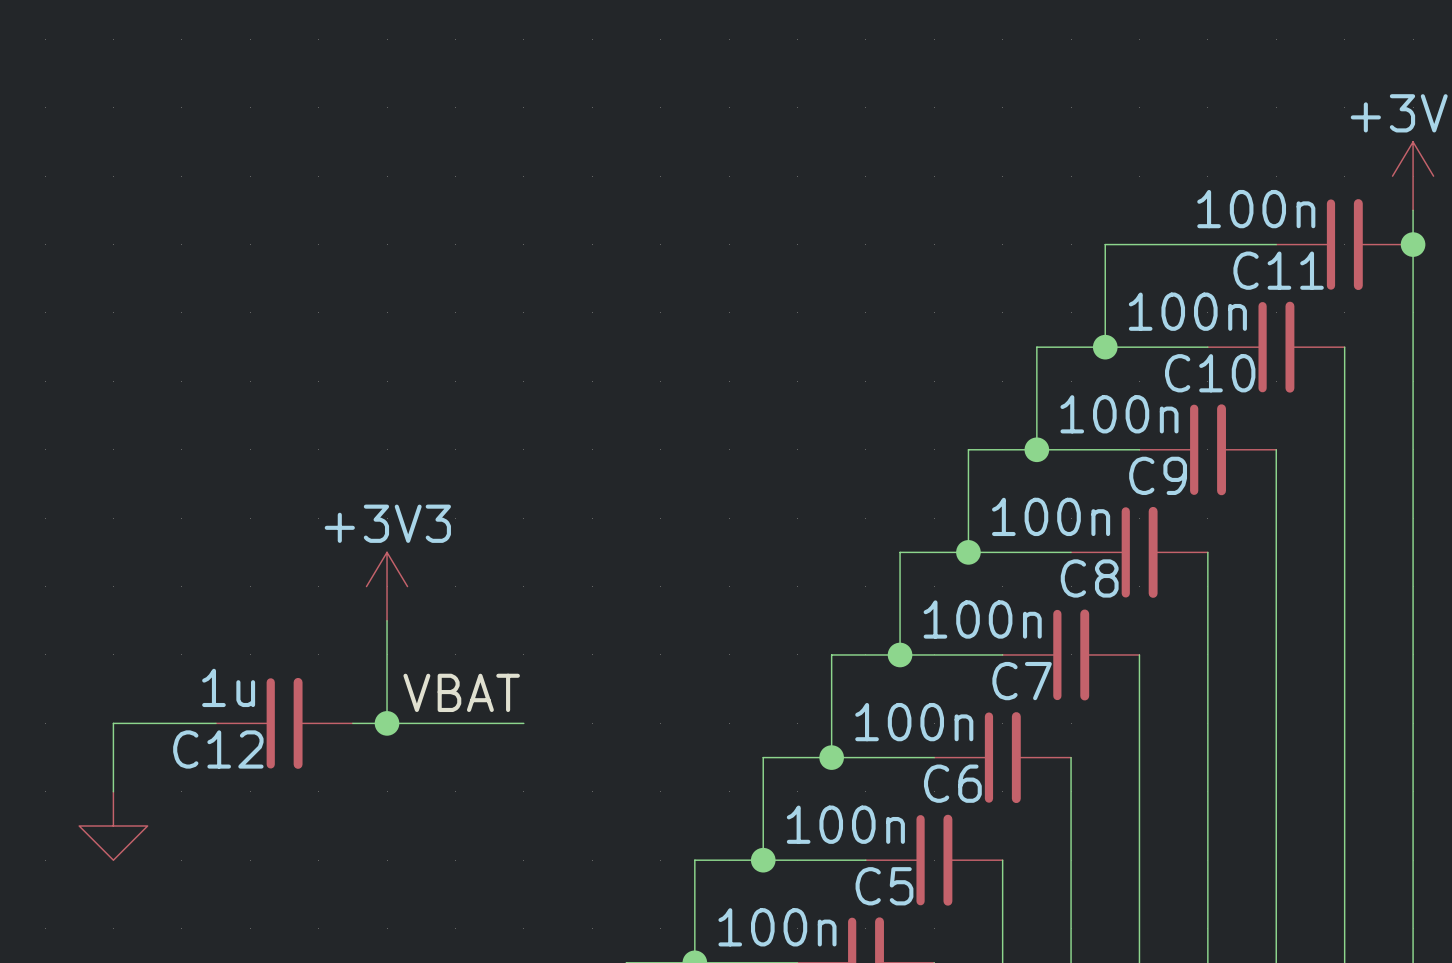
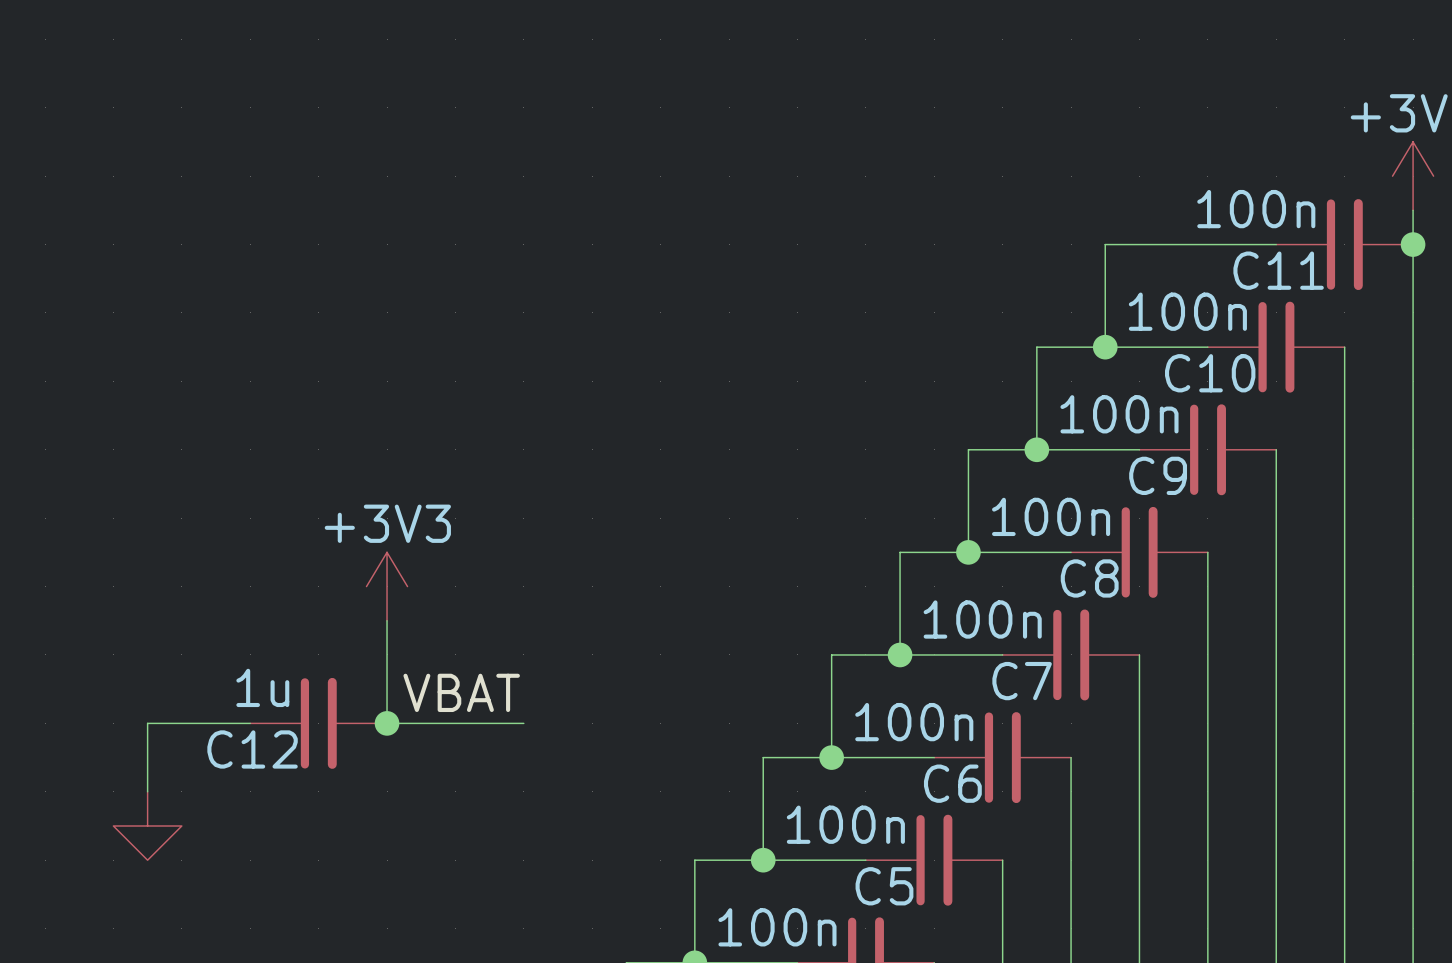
wire: (147, 723) (113, 723) (113, 791) -> (147, 723) (147, 791)
C12 position: (284, 723) -> (318, 723)
power symbol position: (113, 825) -> (147, 825)

